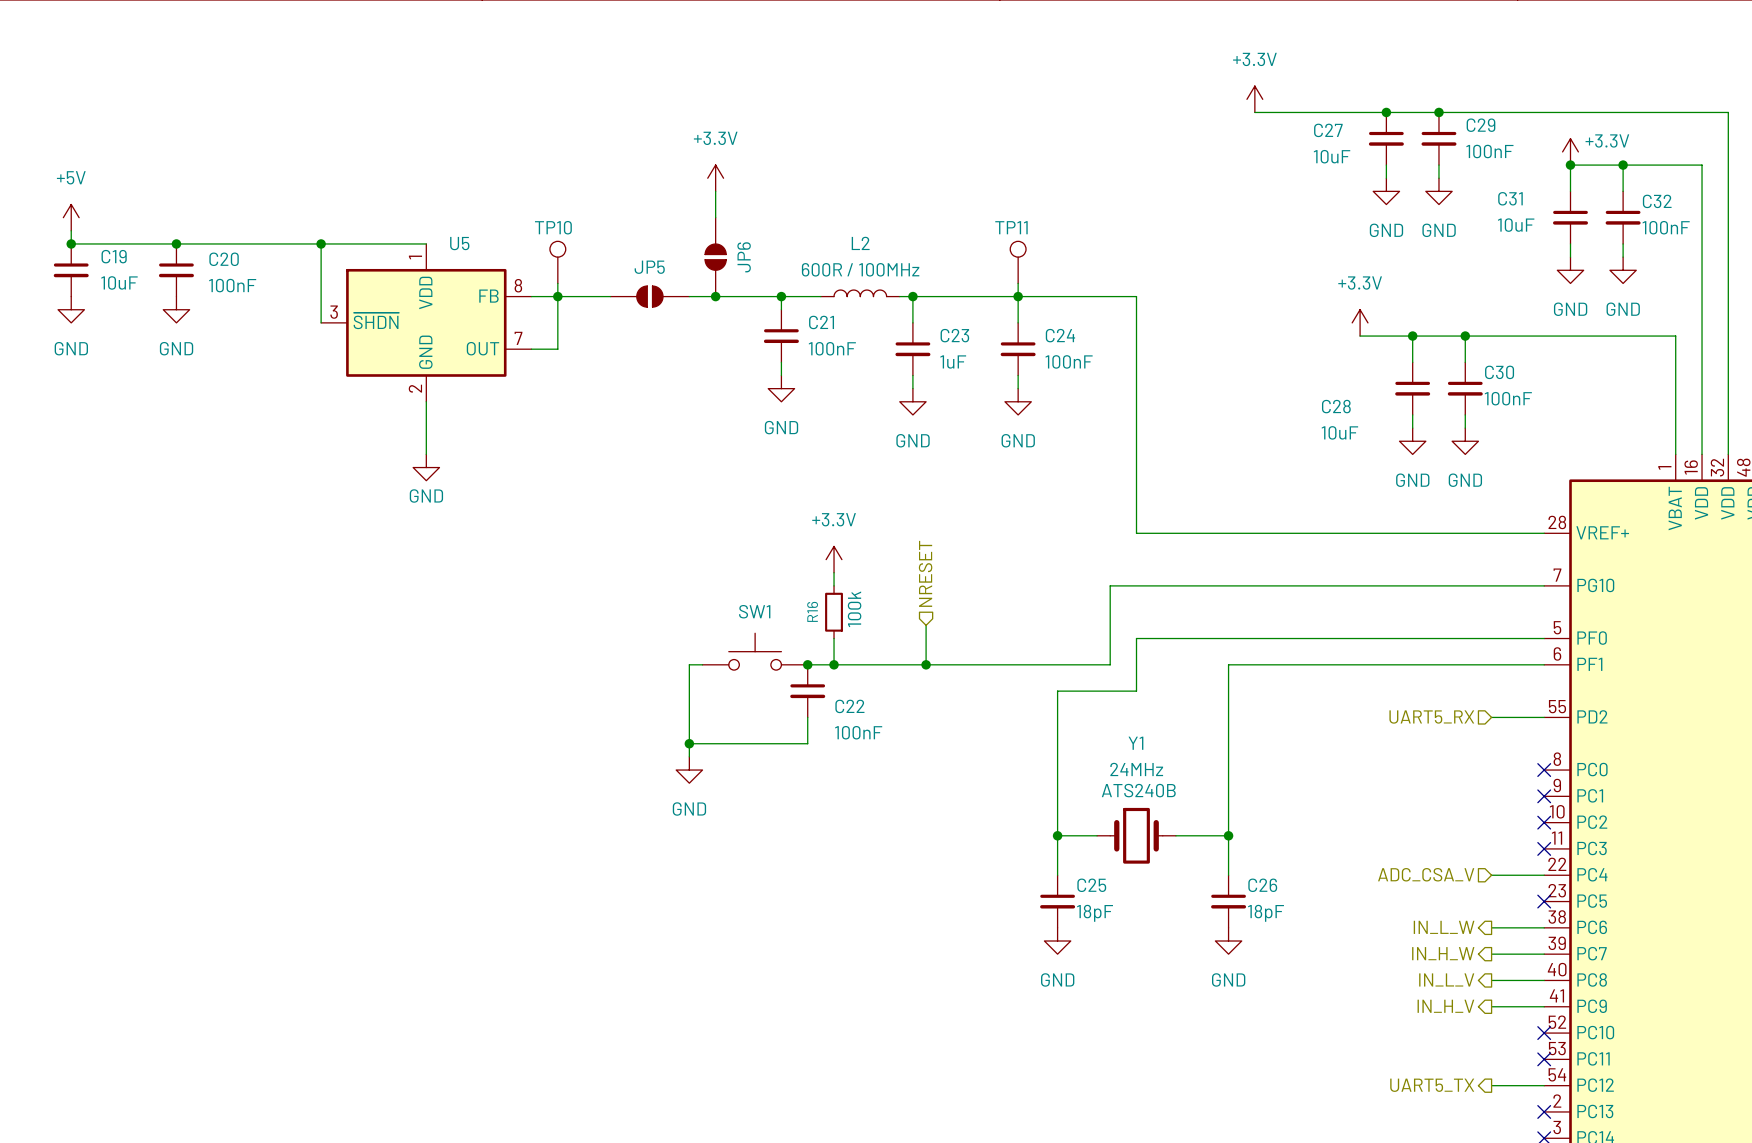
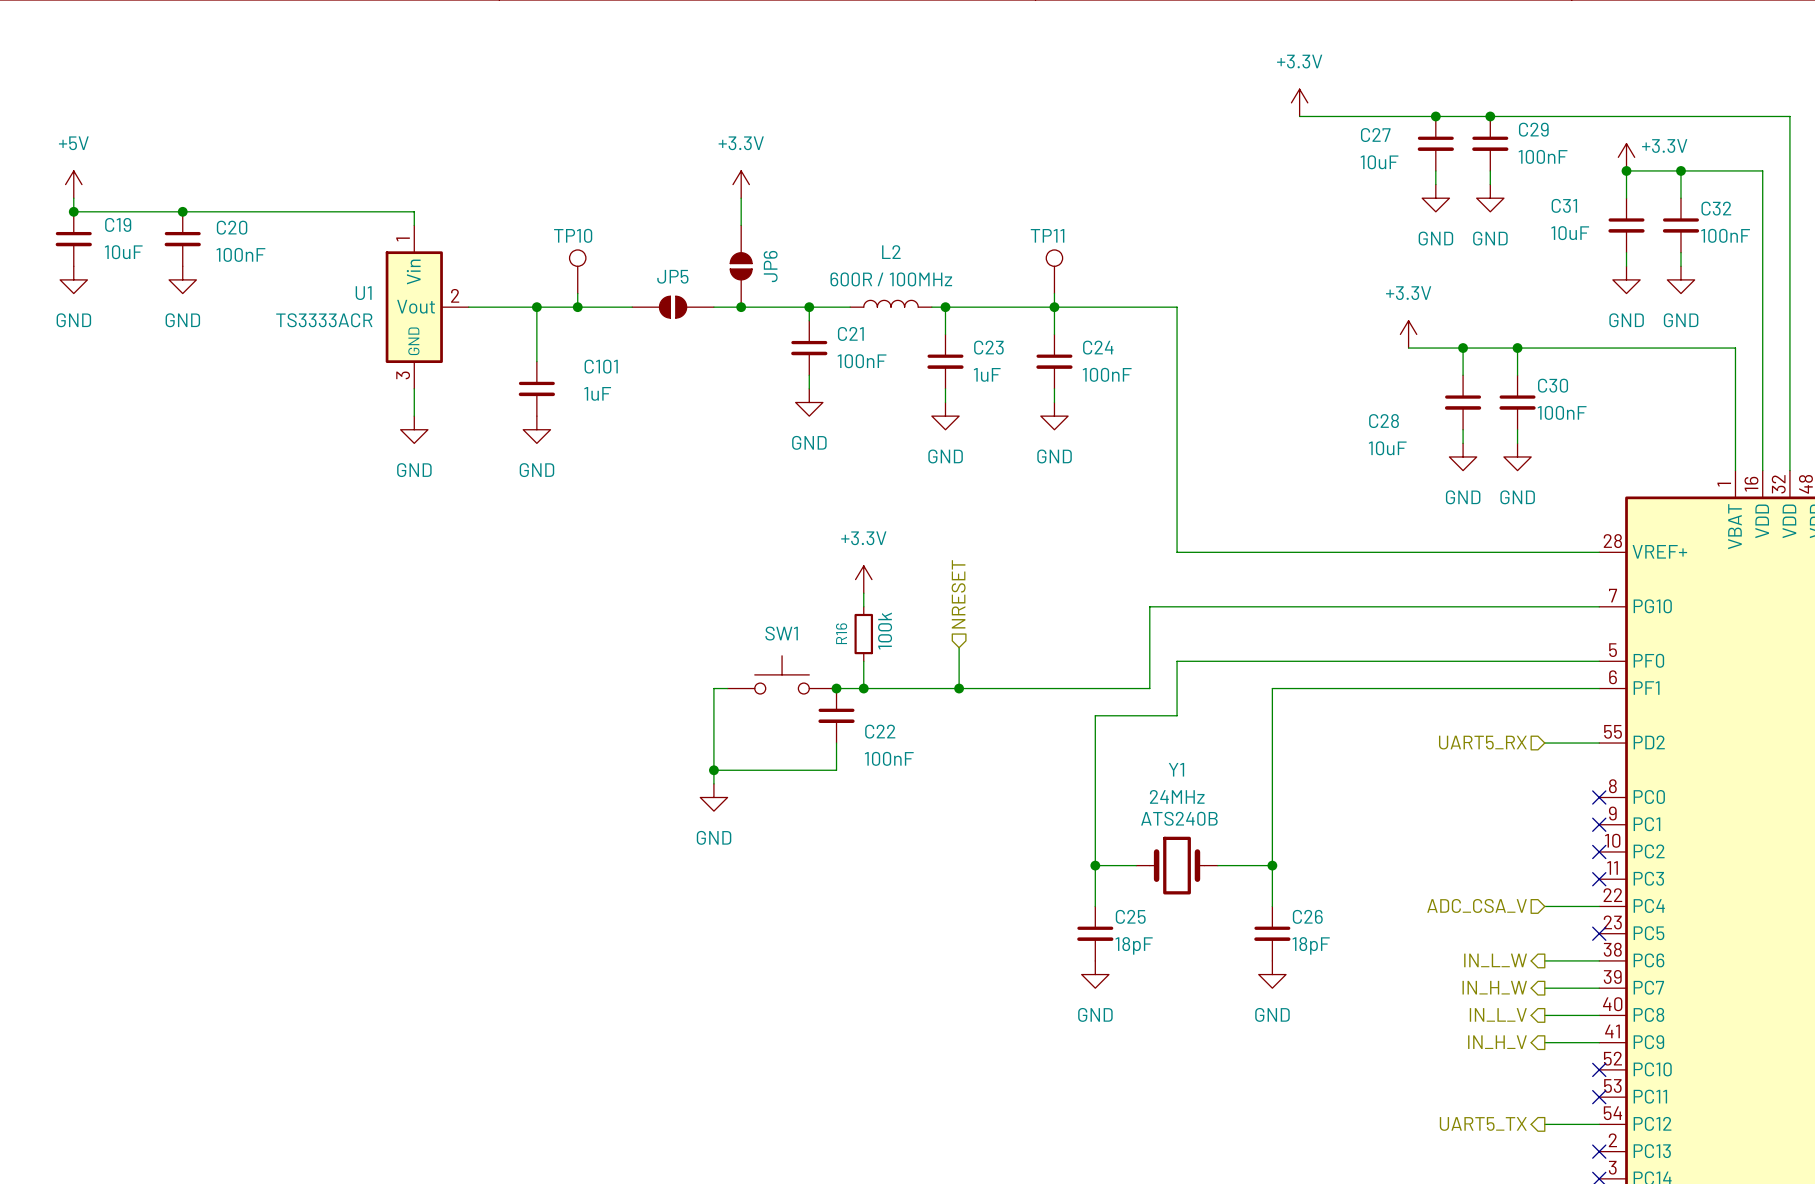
wire: none -> (73, 198) (73, 211) (414, 211) (414, 225)
power symbol position: +5V (71, 217) -> +5V (73, 184)
wire: (71, 230) (71, 243) (426, 243) -> none
junction position: (71, 243) -> (73, 211)
junction position: (176, 243) -> (182, 211)
wire: (321, 243) (321, 322) -> none
junction: (321, 243) -> none
C19 position: (71, 270) -> (73, 239)
C20 position: (176, 270) -> (182, 239)
U1: none -> TS3333ACR (427, 307)
junction: none -> (536, 307)
wire: (557, 296) (557, 349) (531, 349) -> none
power symbol position: GND (71, 309) -> GND (73, 279)
power symbol position: GND (176, 309) -> GND (182, 279)
U5: (426, 322) -> none
wire: none -> (414, 388) (414, 416)
C101: none -> 1uF (536, 388)
wire: (426, 401) (426, 454) -> (536, 307) (536, 361)
power symbol: none -> GND (414, 429)
power symbol: none -> GND (536, 429)
power symbol: GND (426, 467) -> none

